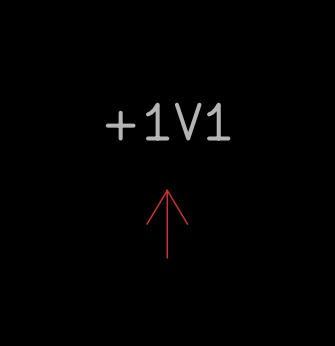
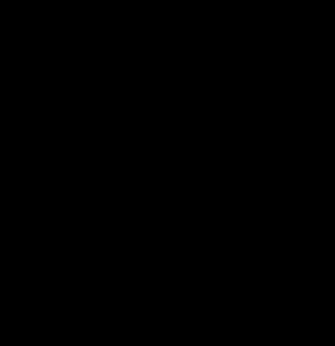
power symbol: +1V1 (167, 224) -> none

